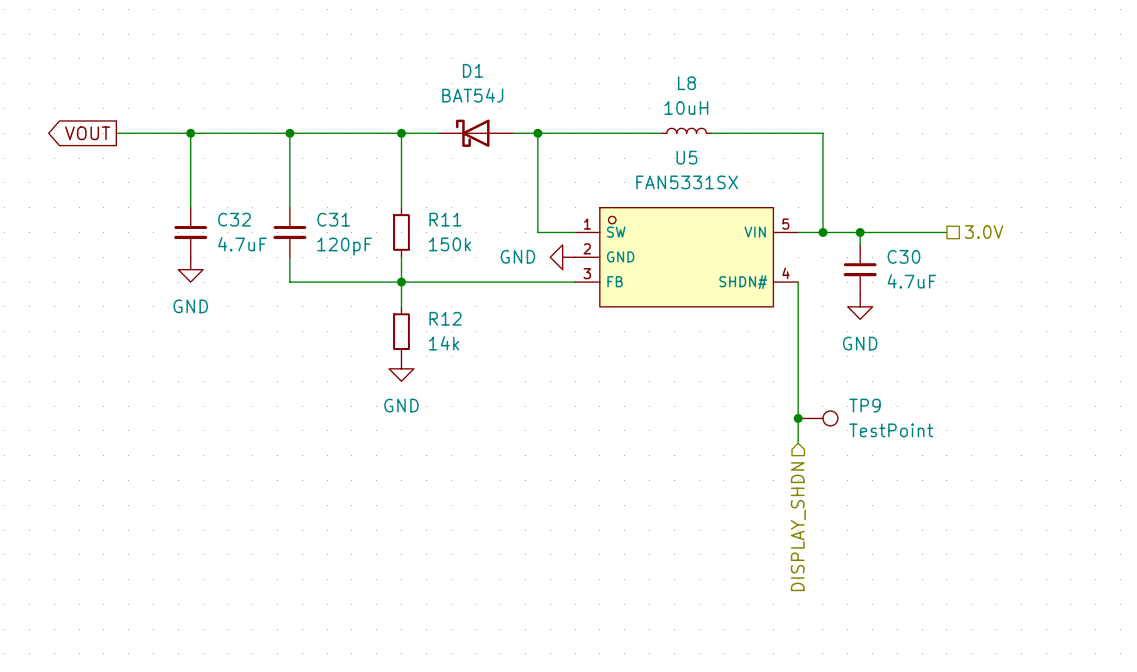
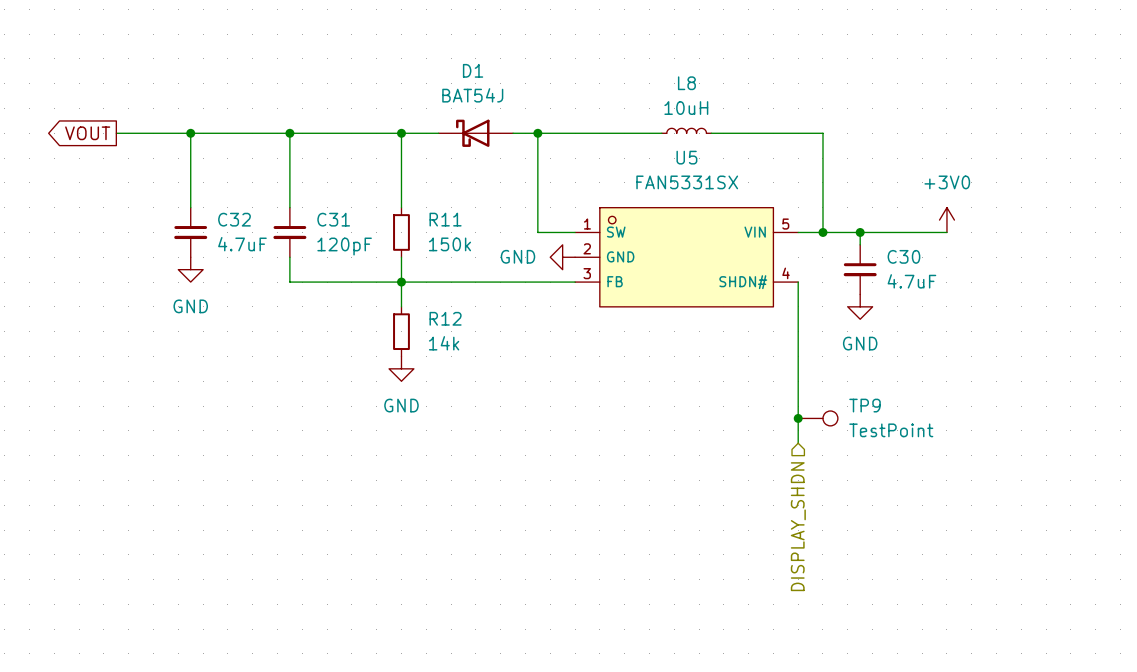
power symbol: none -> +3V0 (946, 220)
hierarchical label: 3.0V (984, 232) -> none

